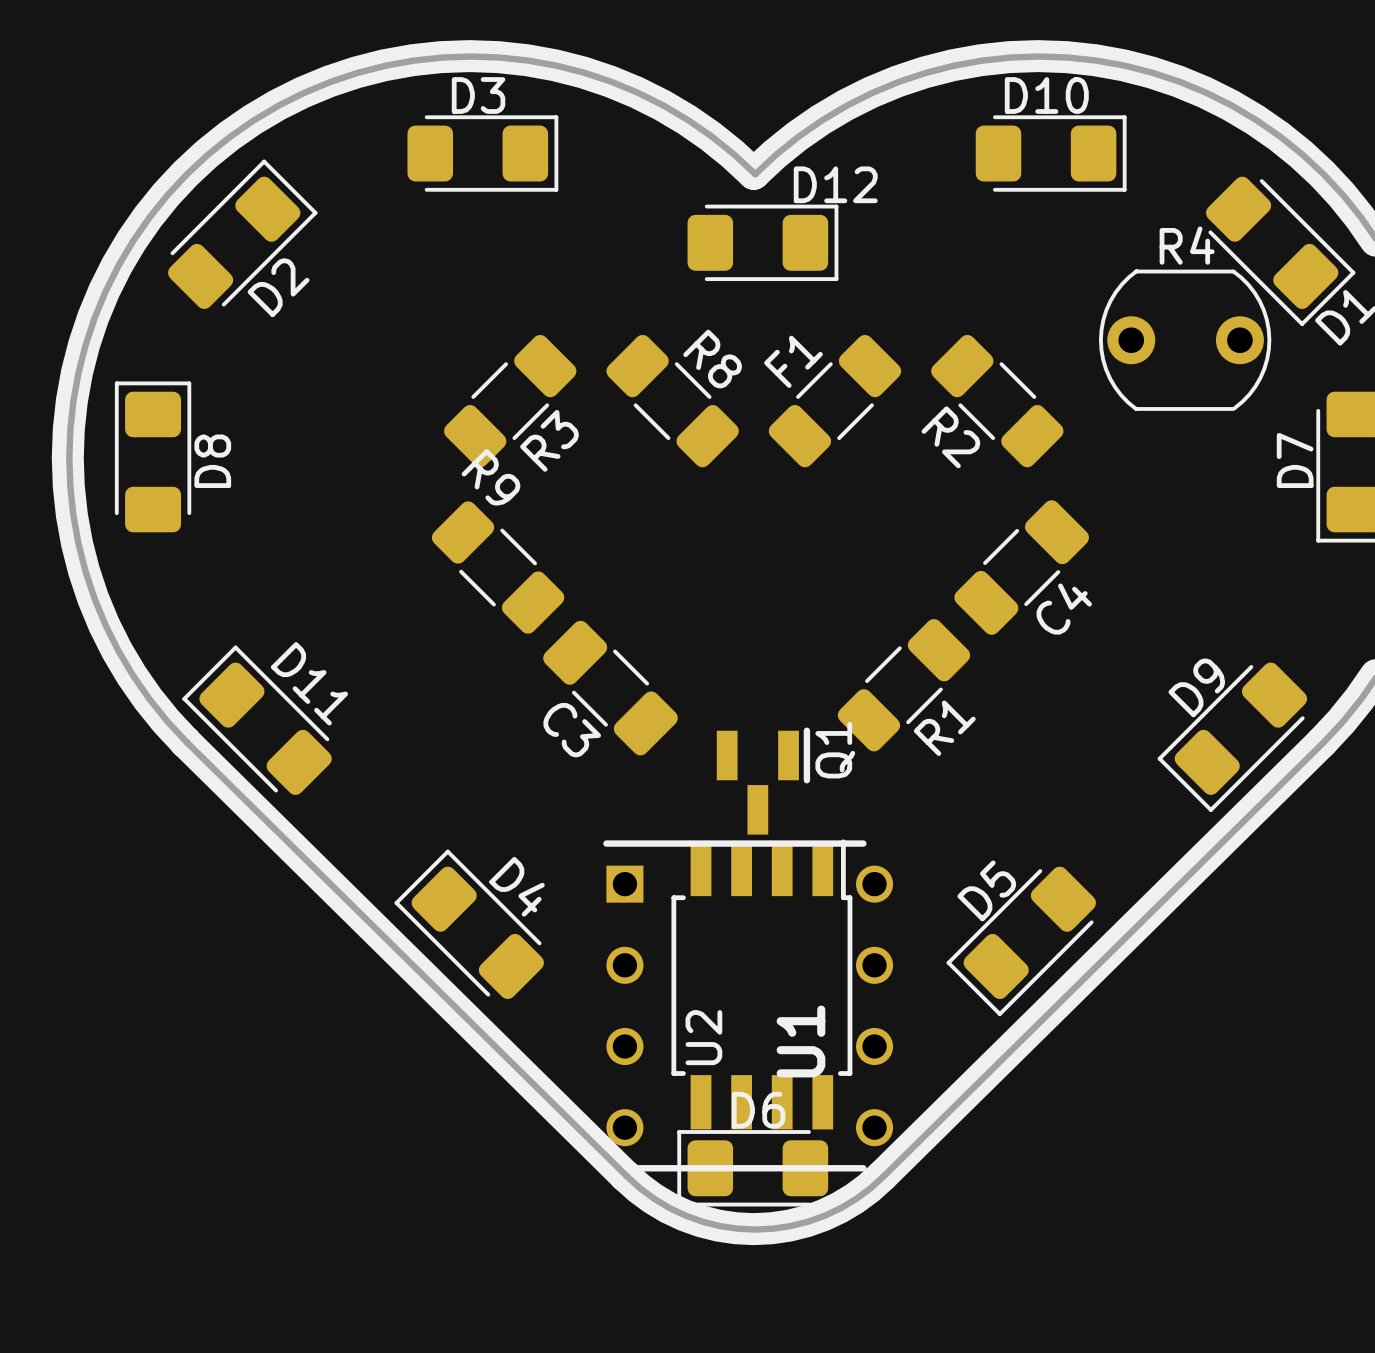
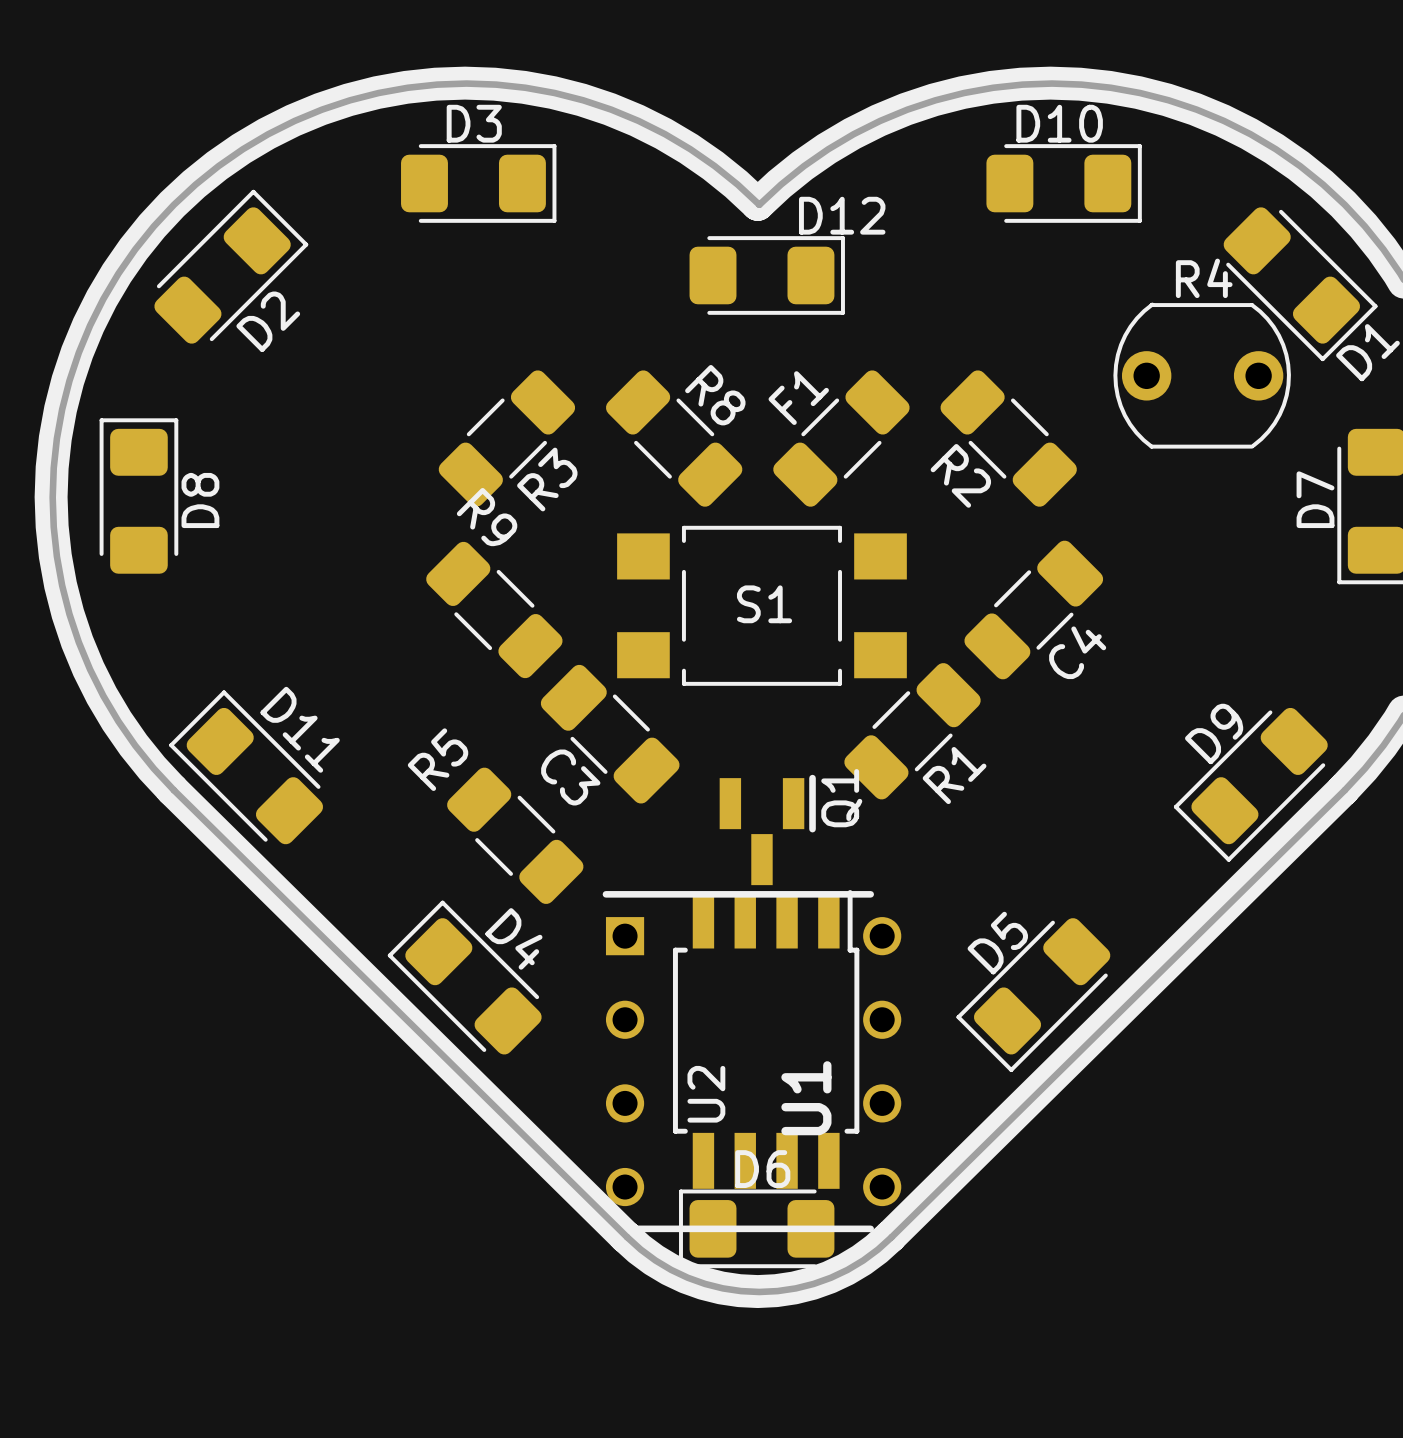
S1: none -> (761, 605)
R5: none -> (515, 835)

